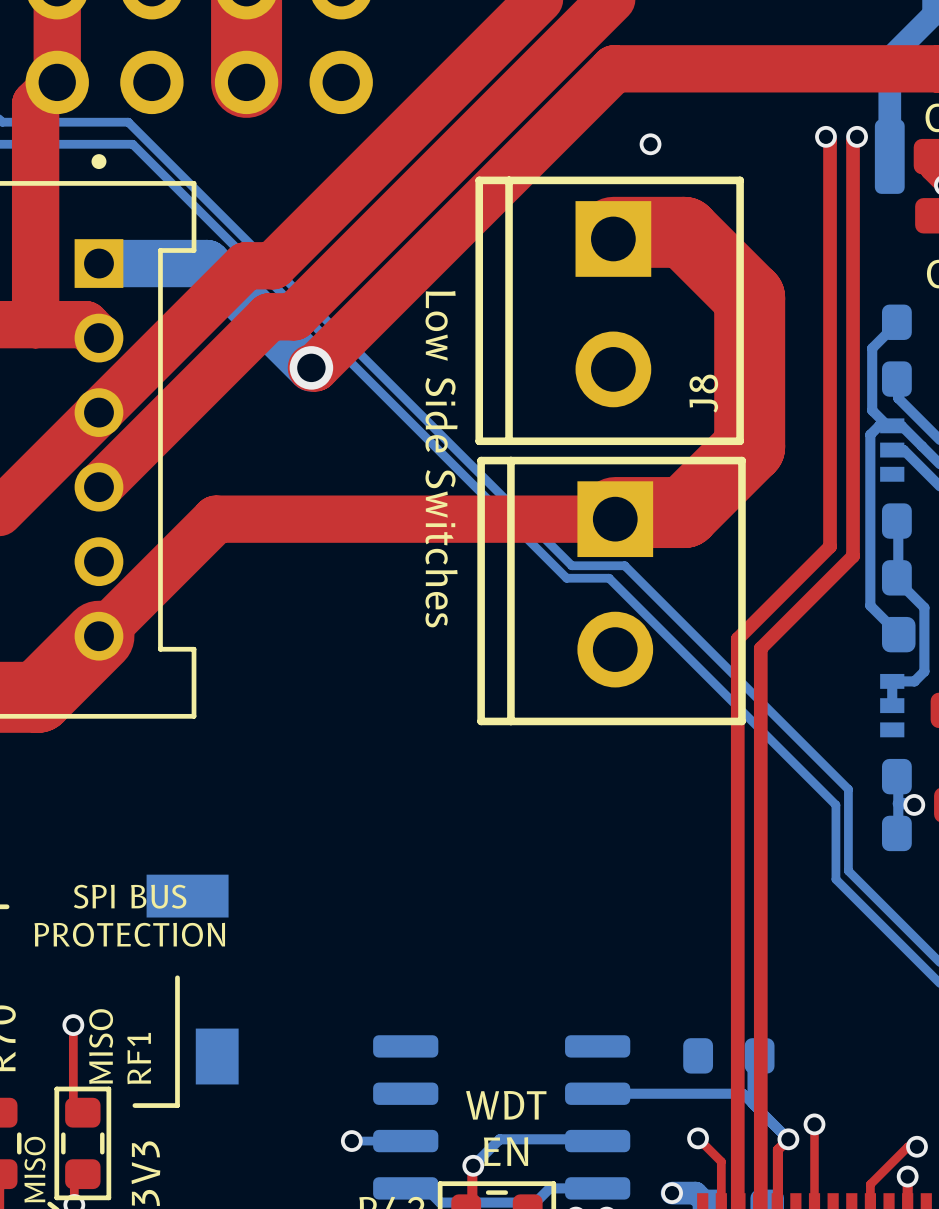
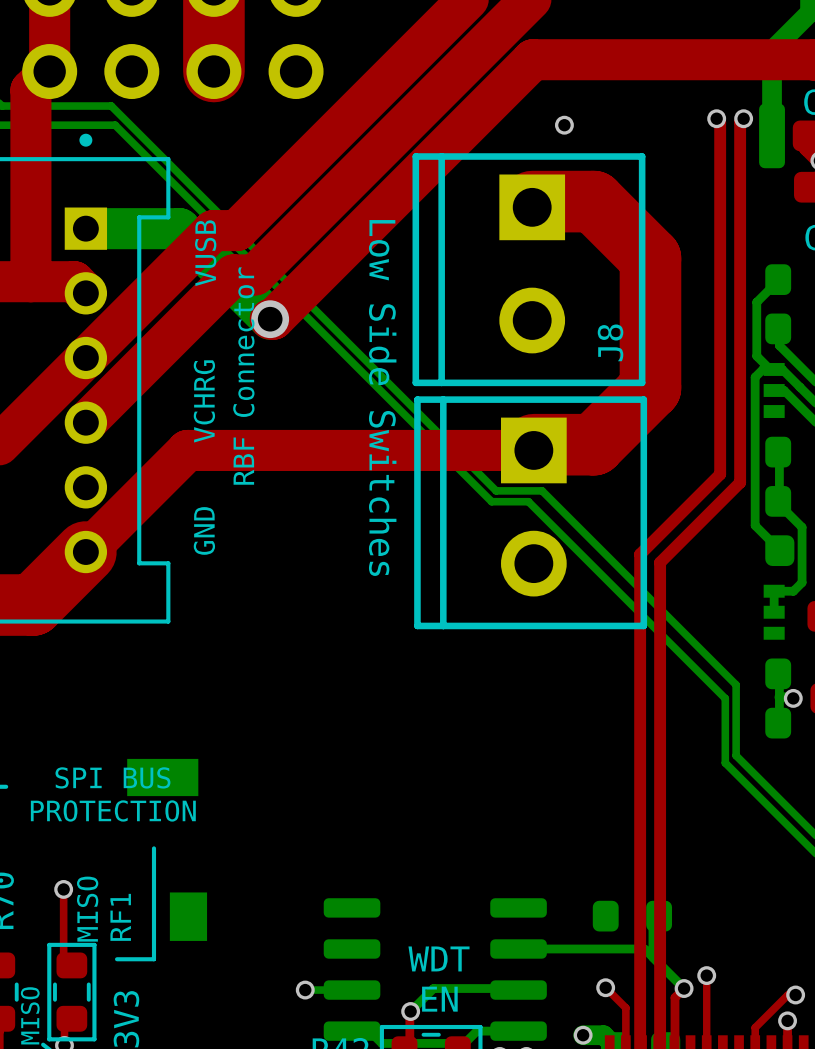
text: none -> VUSB (205, 253)
text: none -> RBF Connector (243, 376)
text: none -> VCHRG (204, 401)
text: none -> GND (204, 530)

